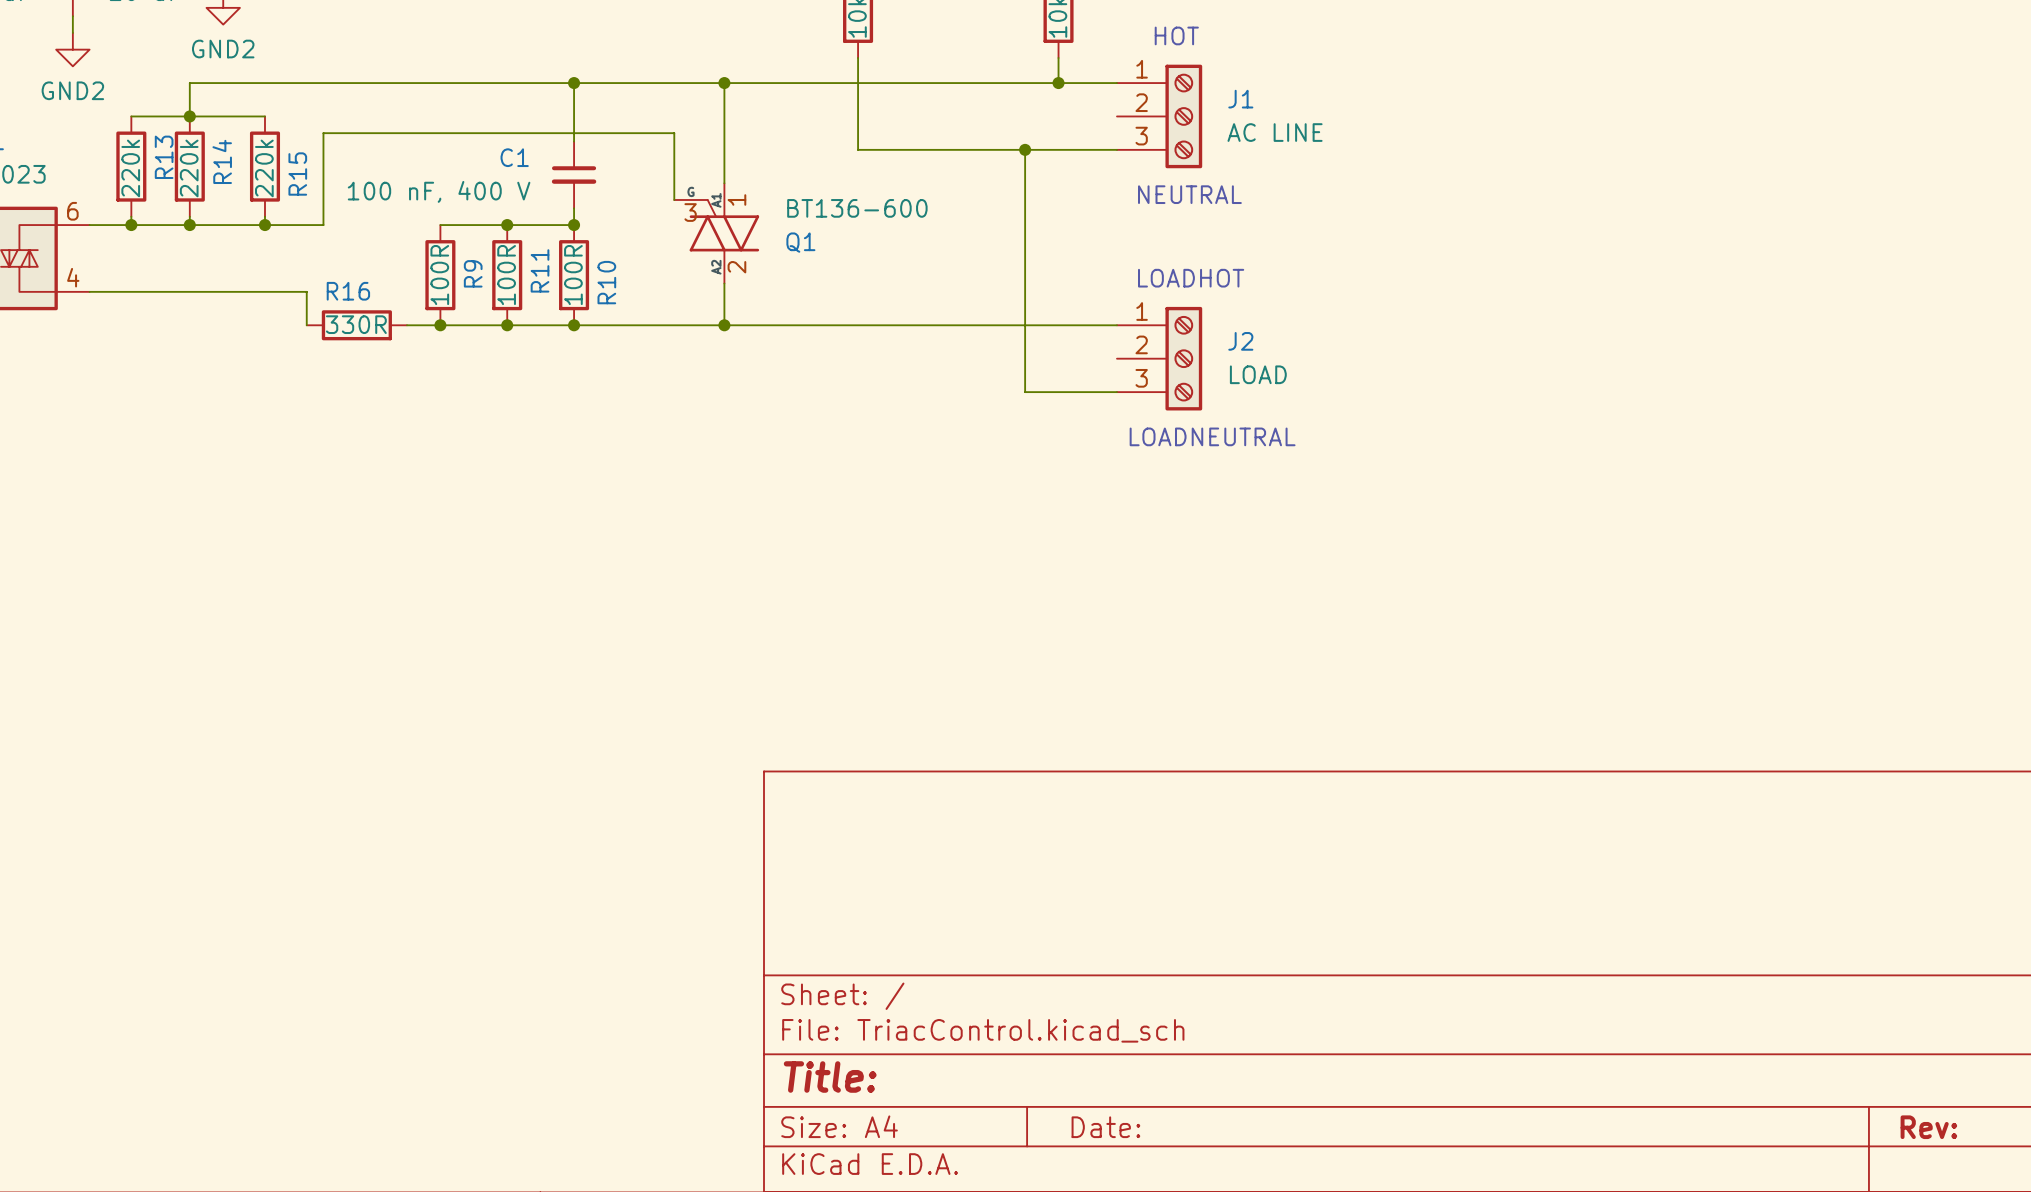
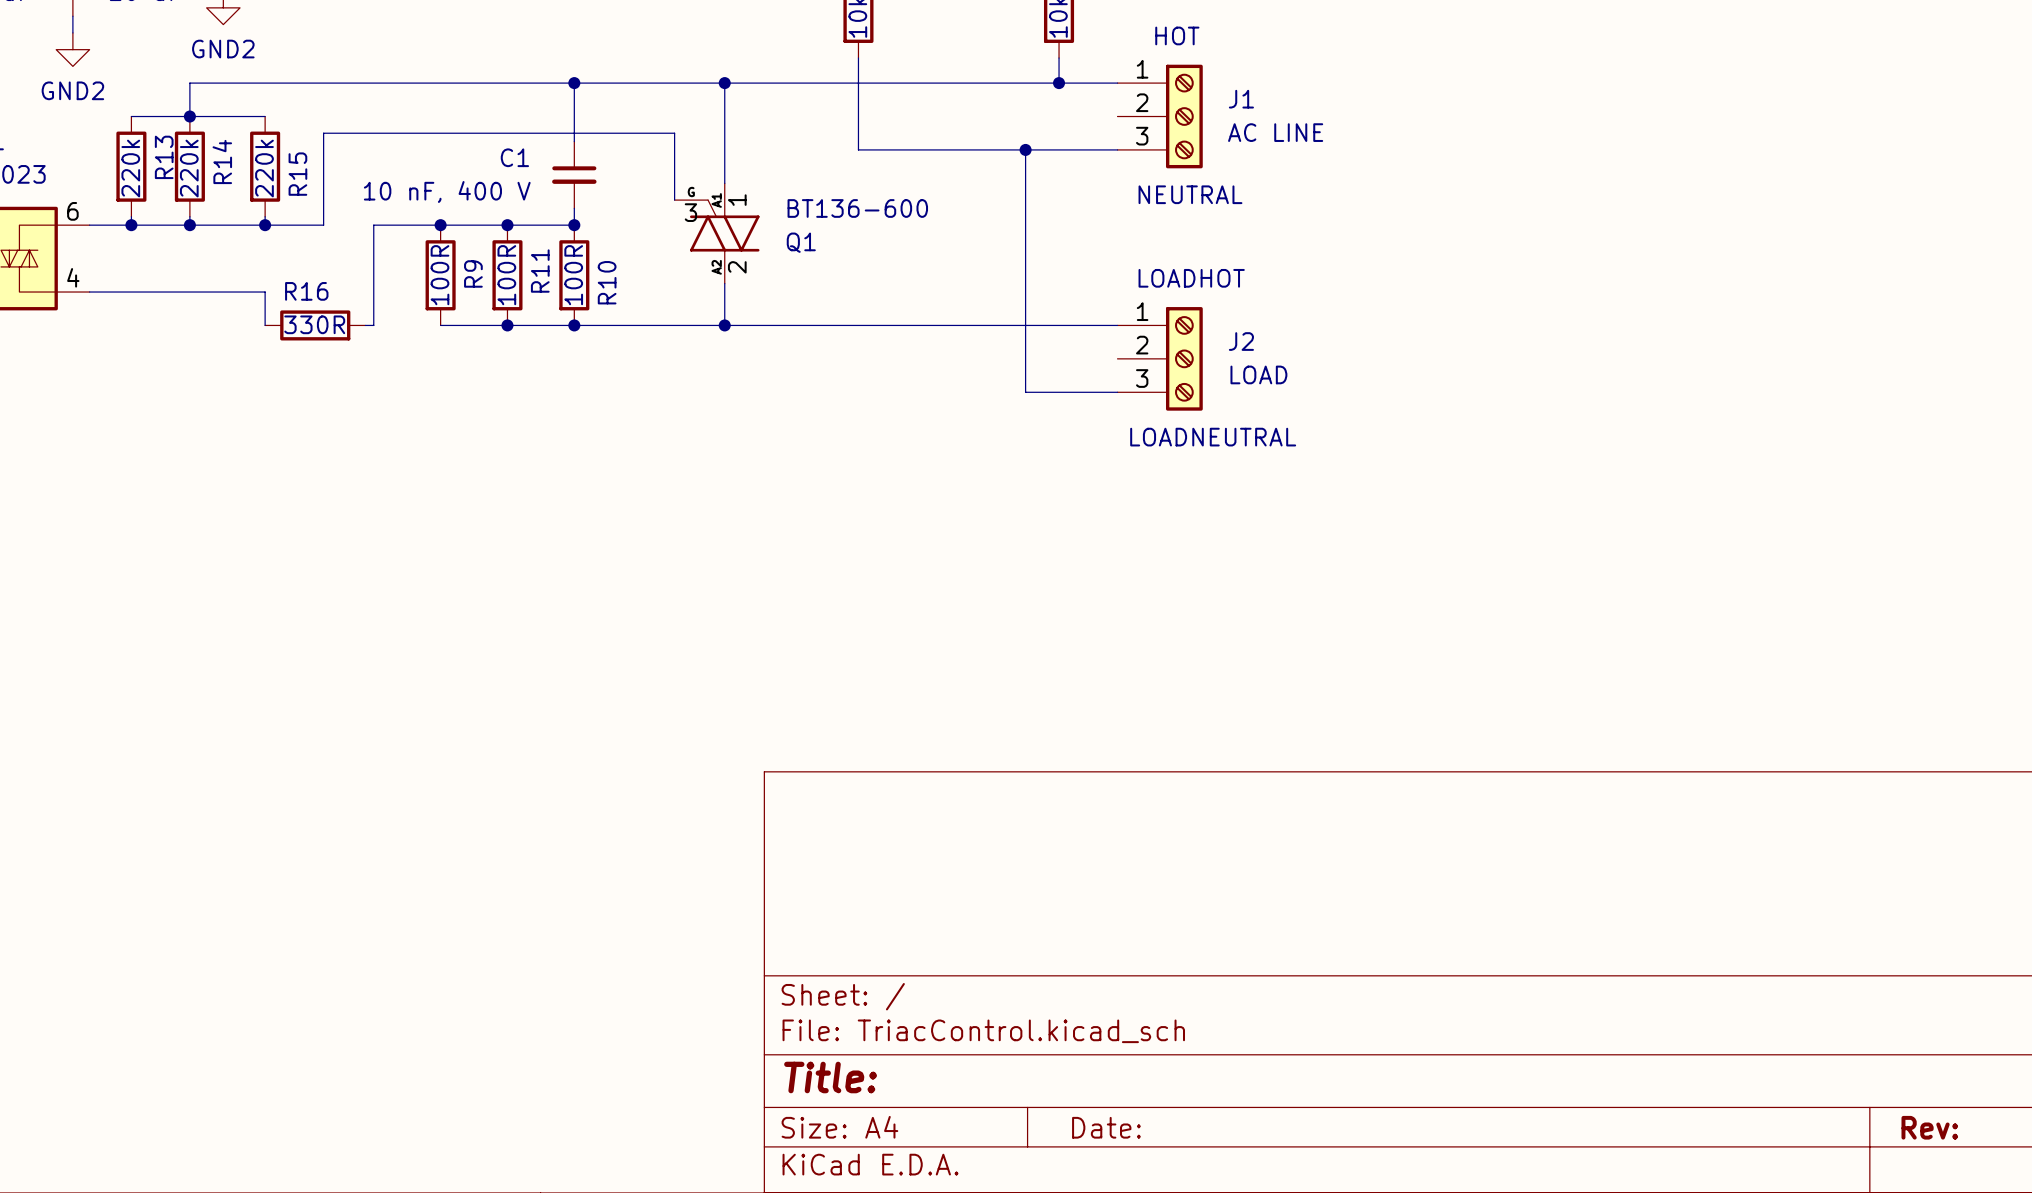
C1 value: 100 nF, 400 V (439, 191) -> 10 nF, 400 V (447, 191)
wire: none -> (440, 225) (373, 225) (373, 325) (365, 325)
junction: none -> (440, 225)
wire: (264, 291) (306, 291) (306, 325) -> (265, 292) (265, 325)
R16 position: (356, 325) -> (315, 325)
wire: (406, 325) (440, 325) -> none
junction: (440, 325) -> none

